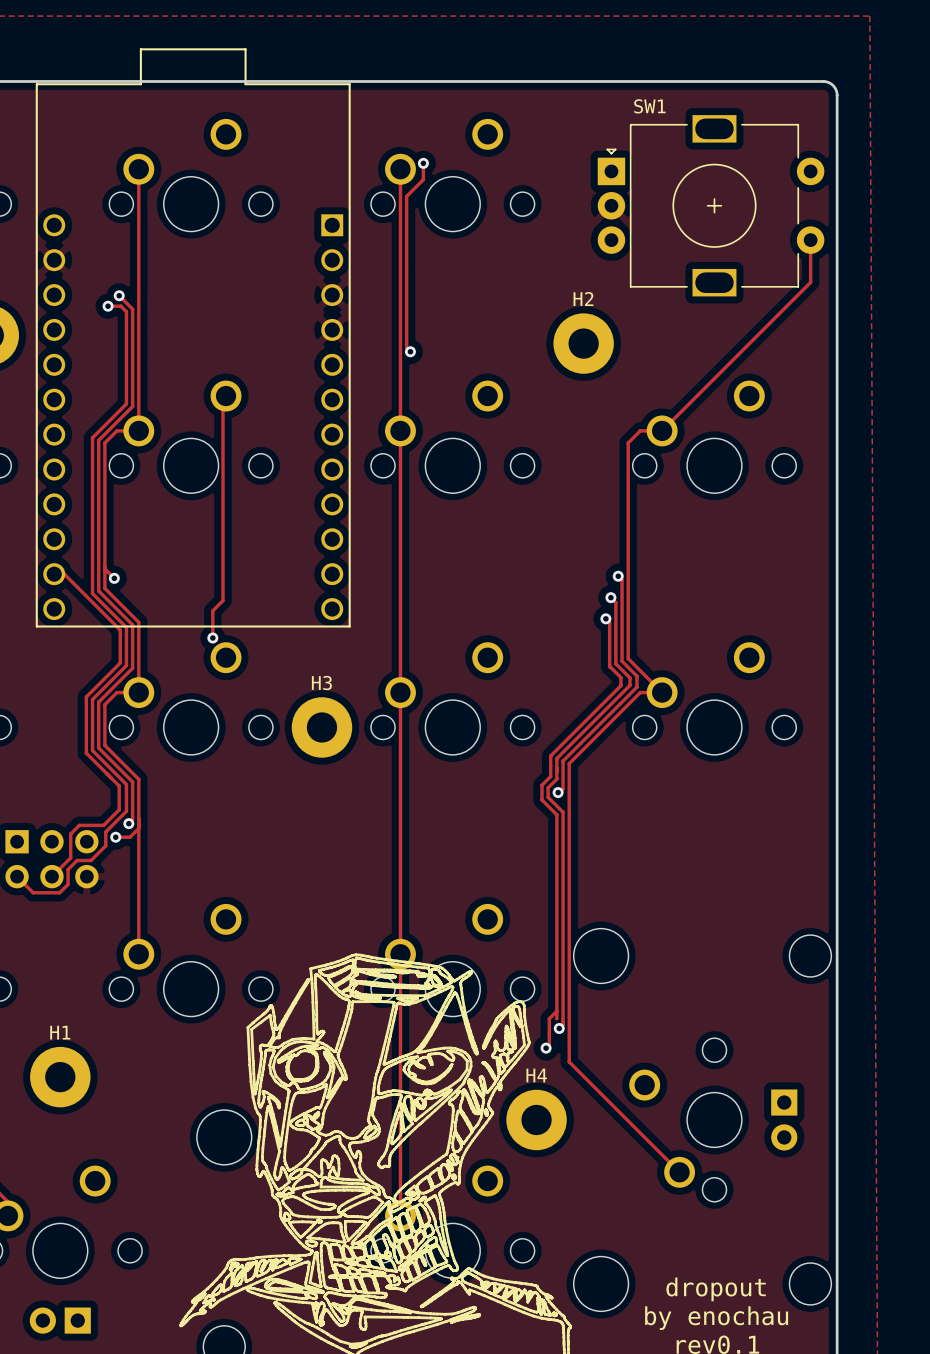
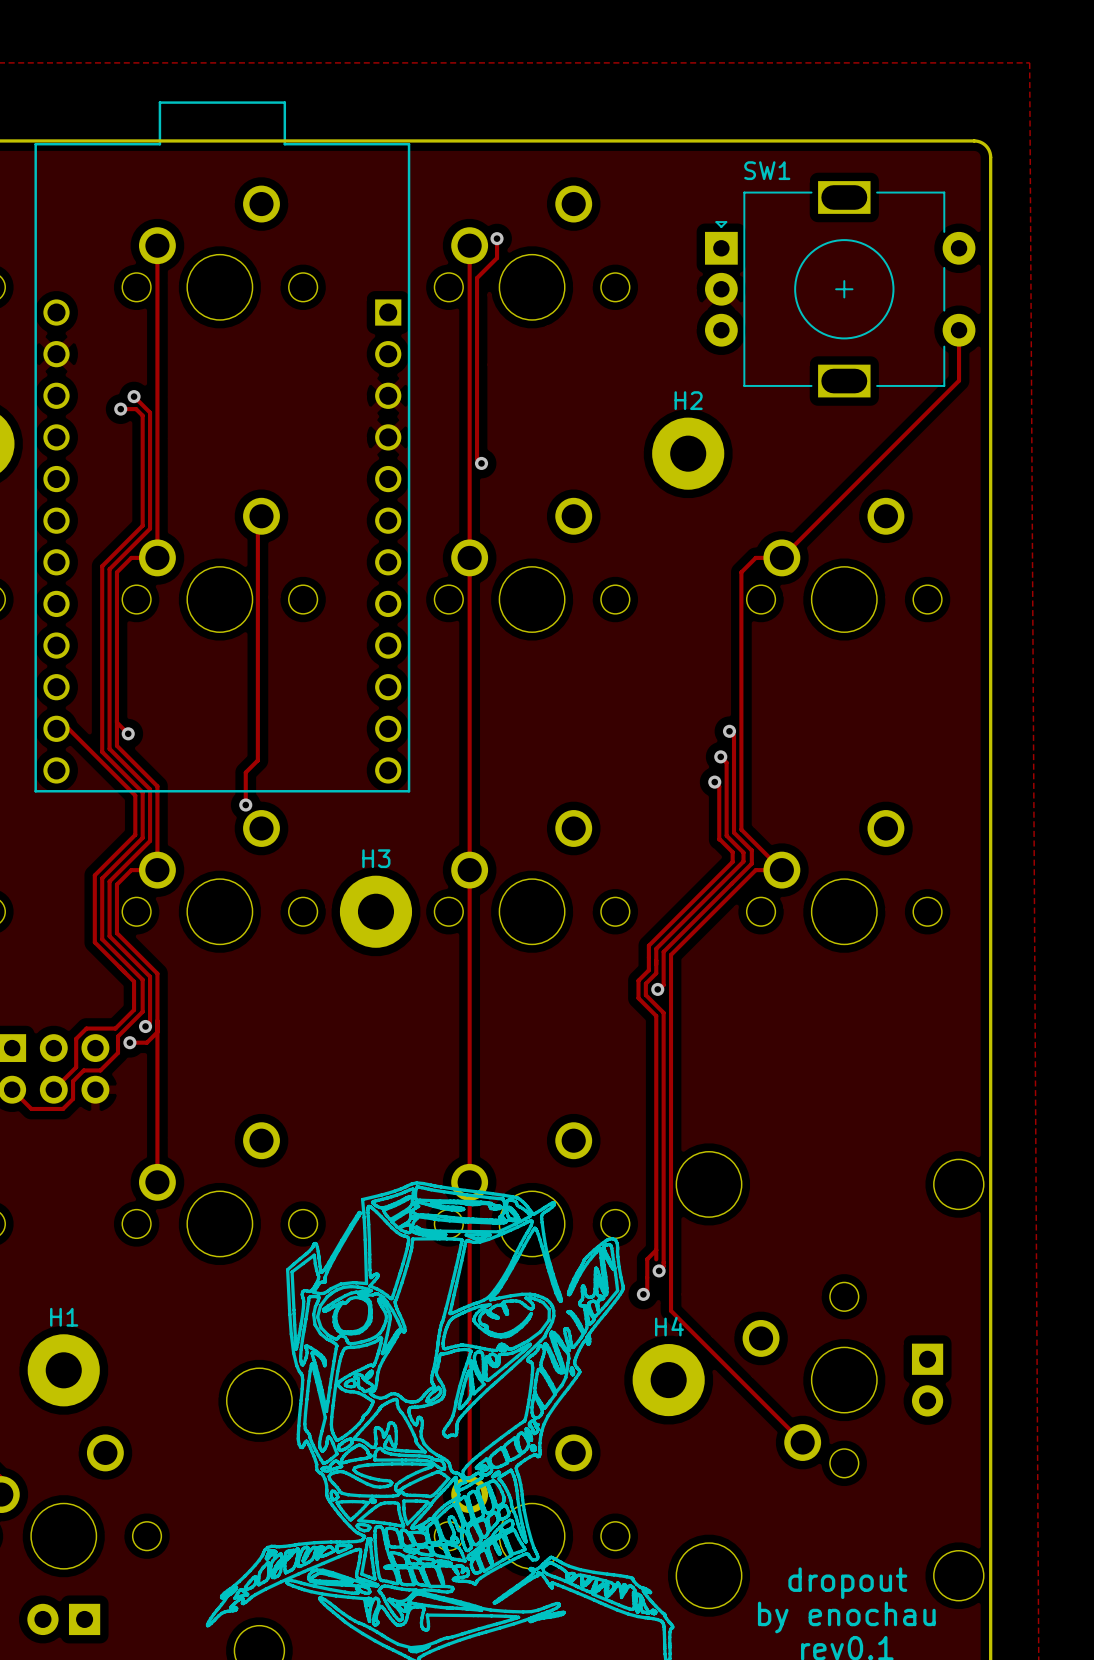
H1 position: (60, 1077) -> (63, 1370)
H4 position: (536, 1119) -> (668, 1380)

